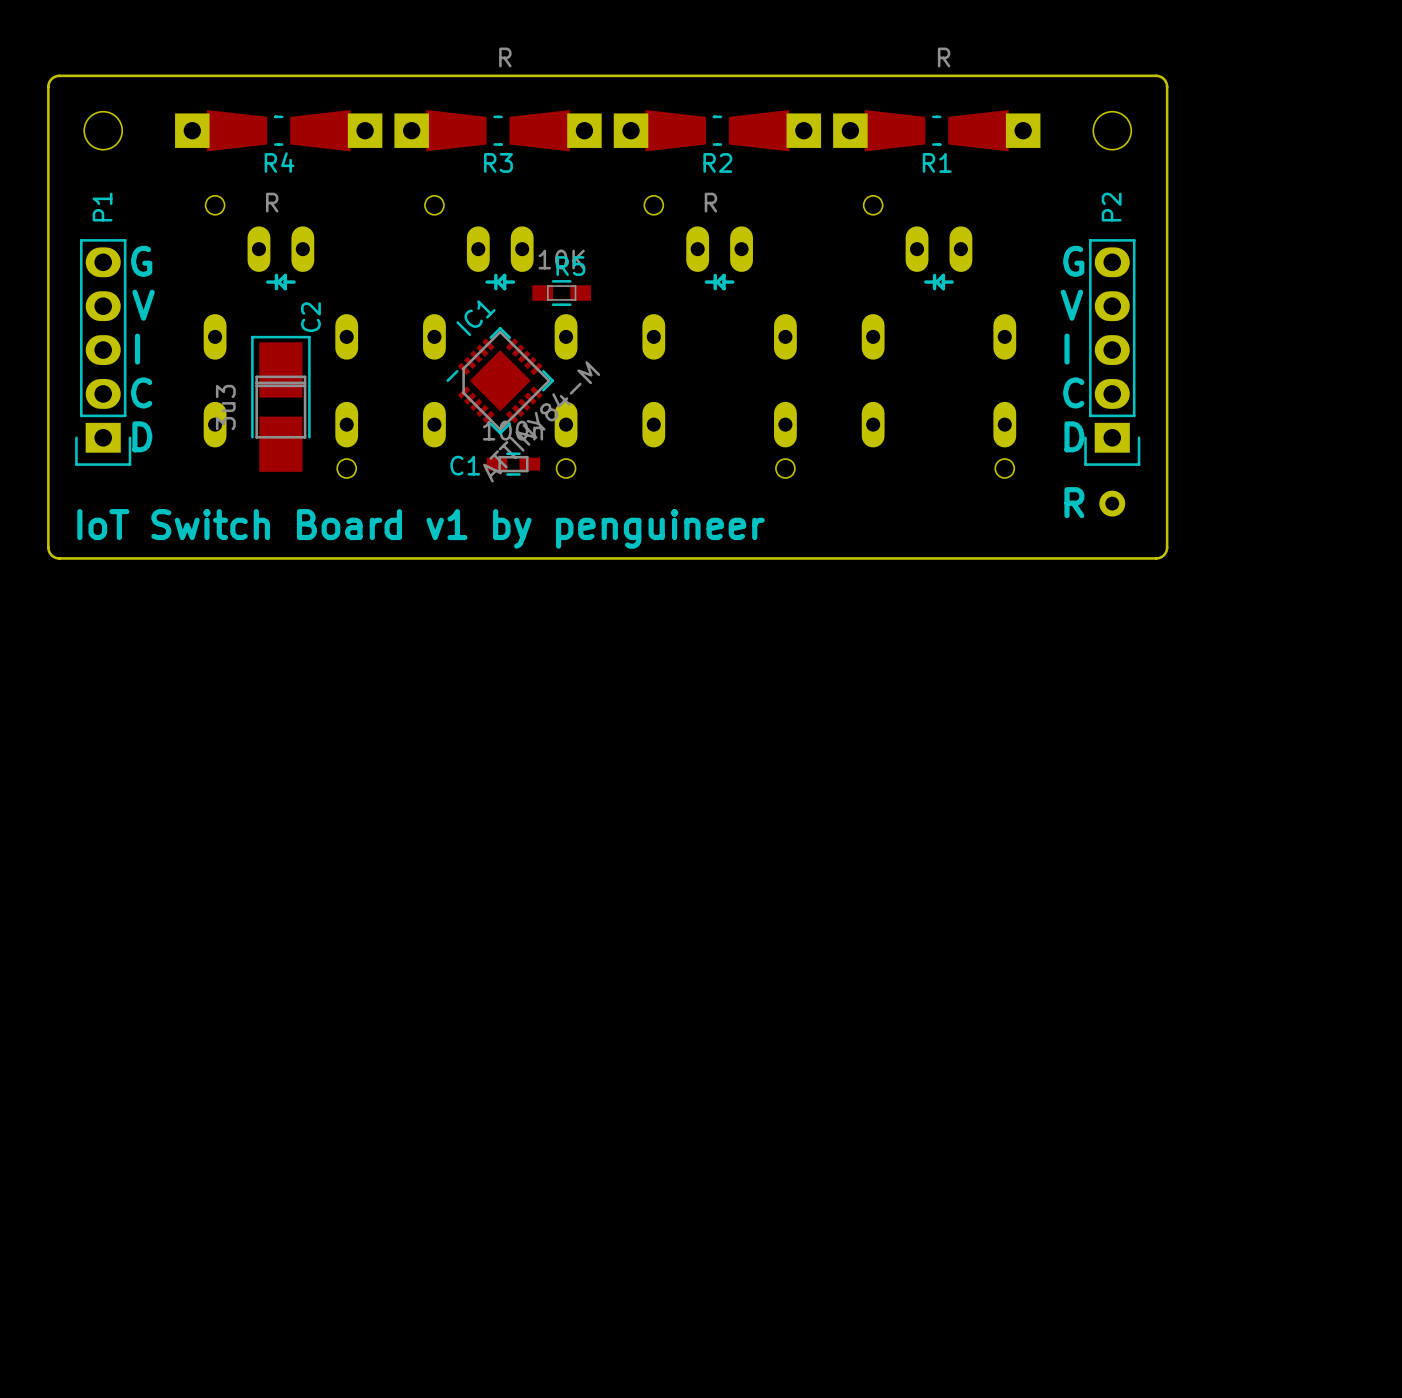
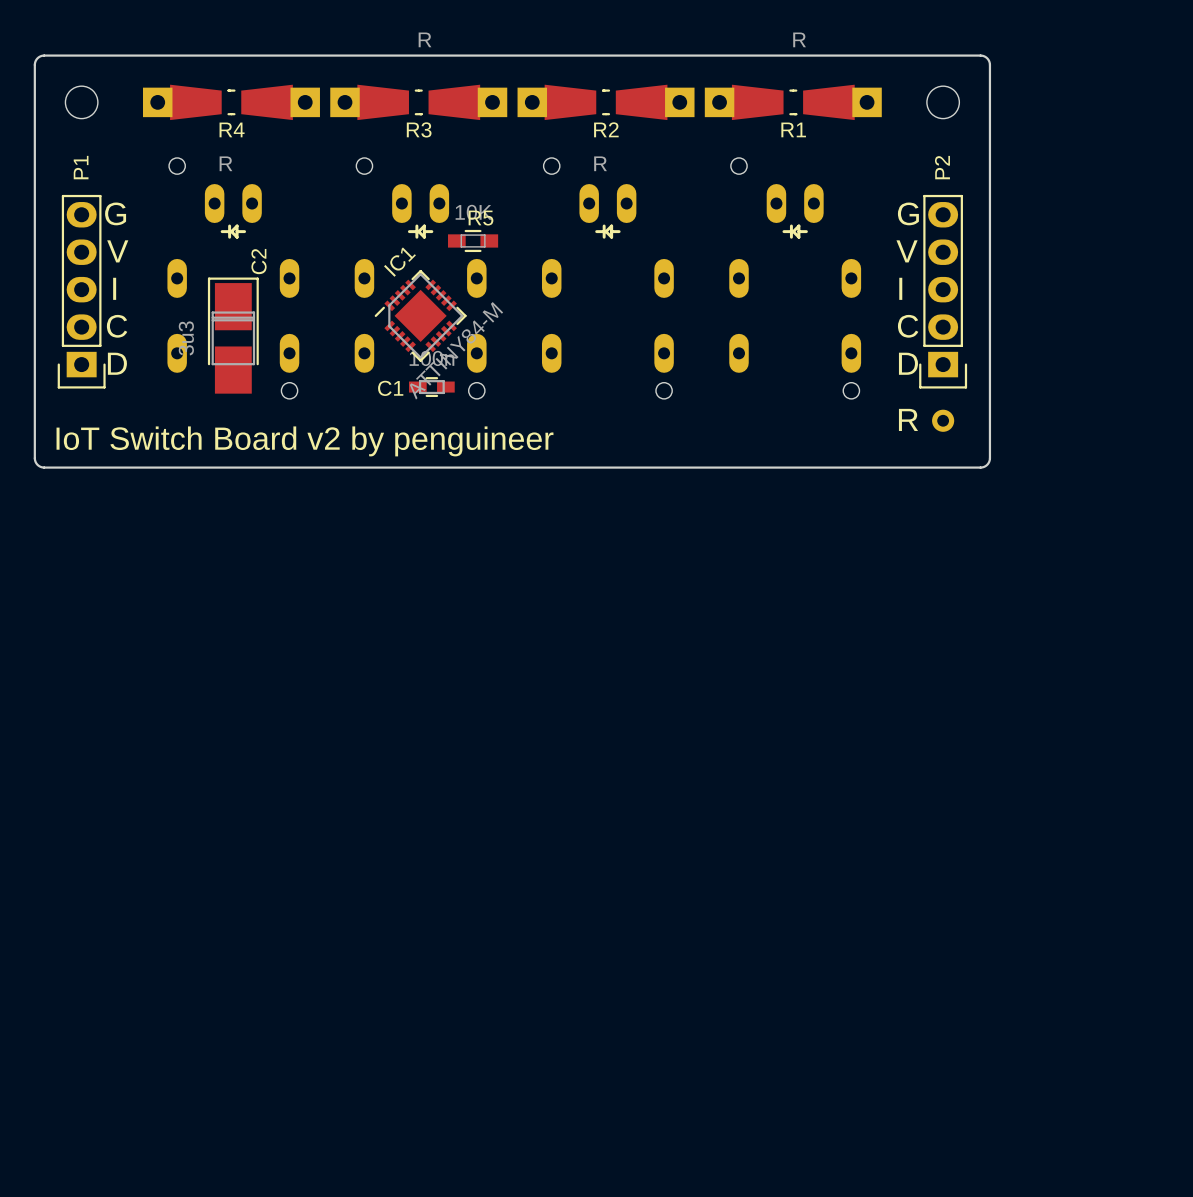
text: IoT Switch Board v1 by penguineer (421, 528) -> IoT Switch Board v2 by penguineer (304, 441)

